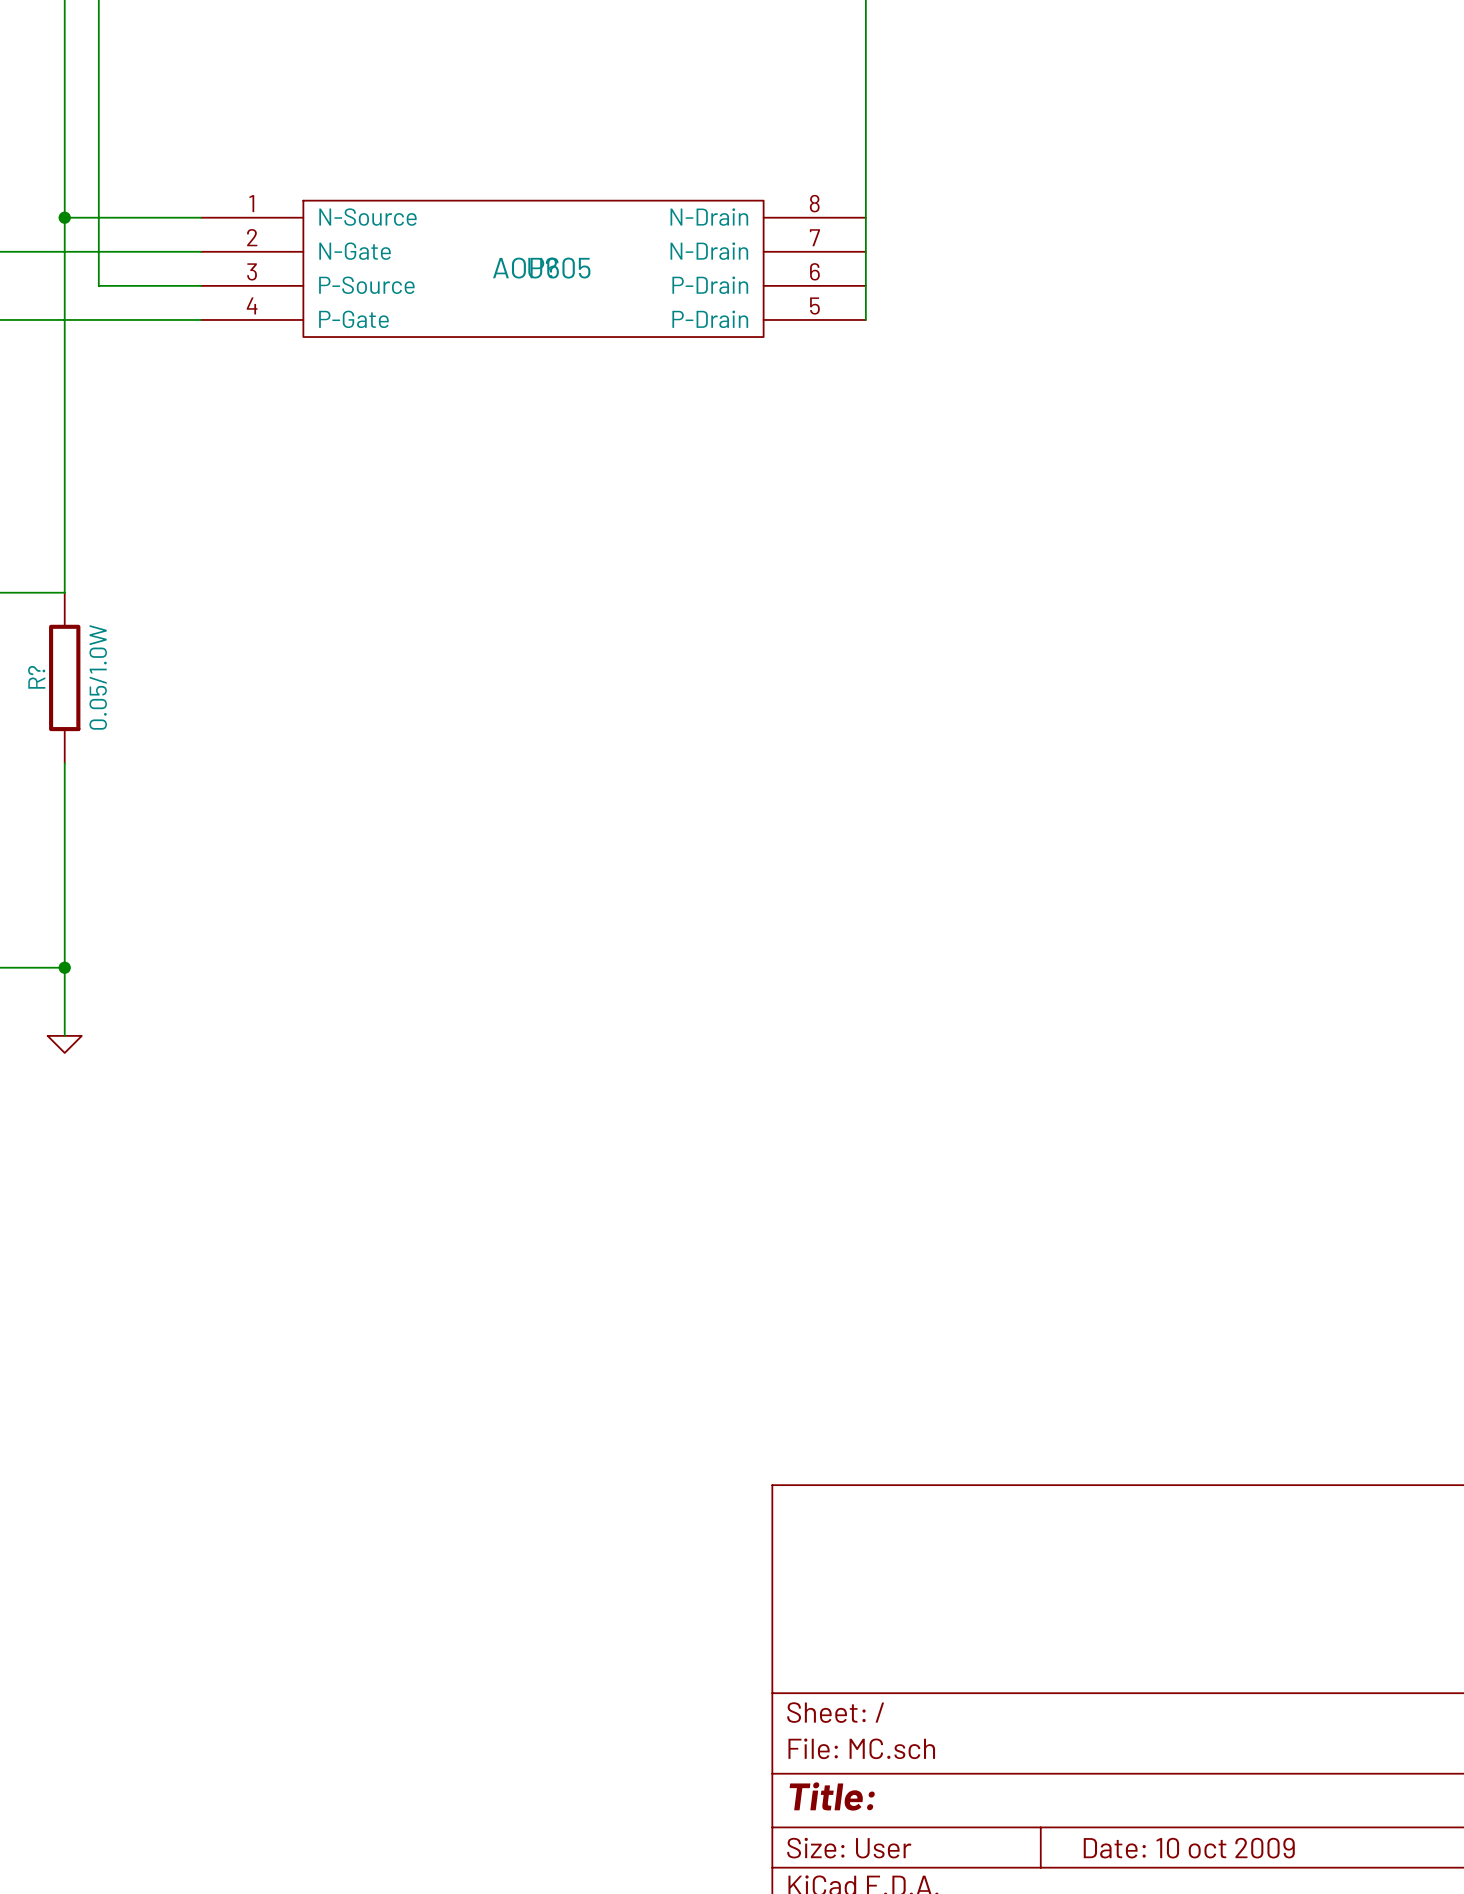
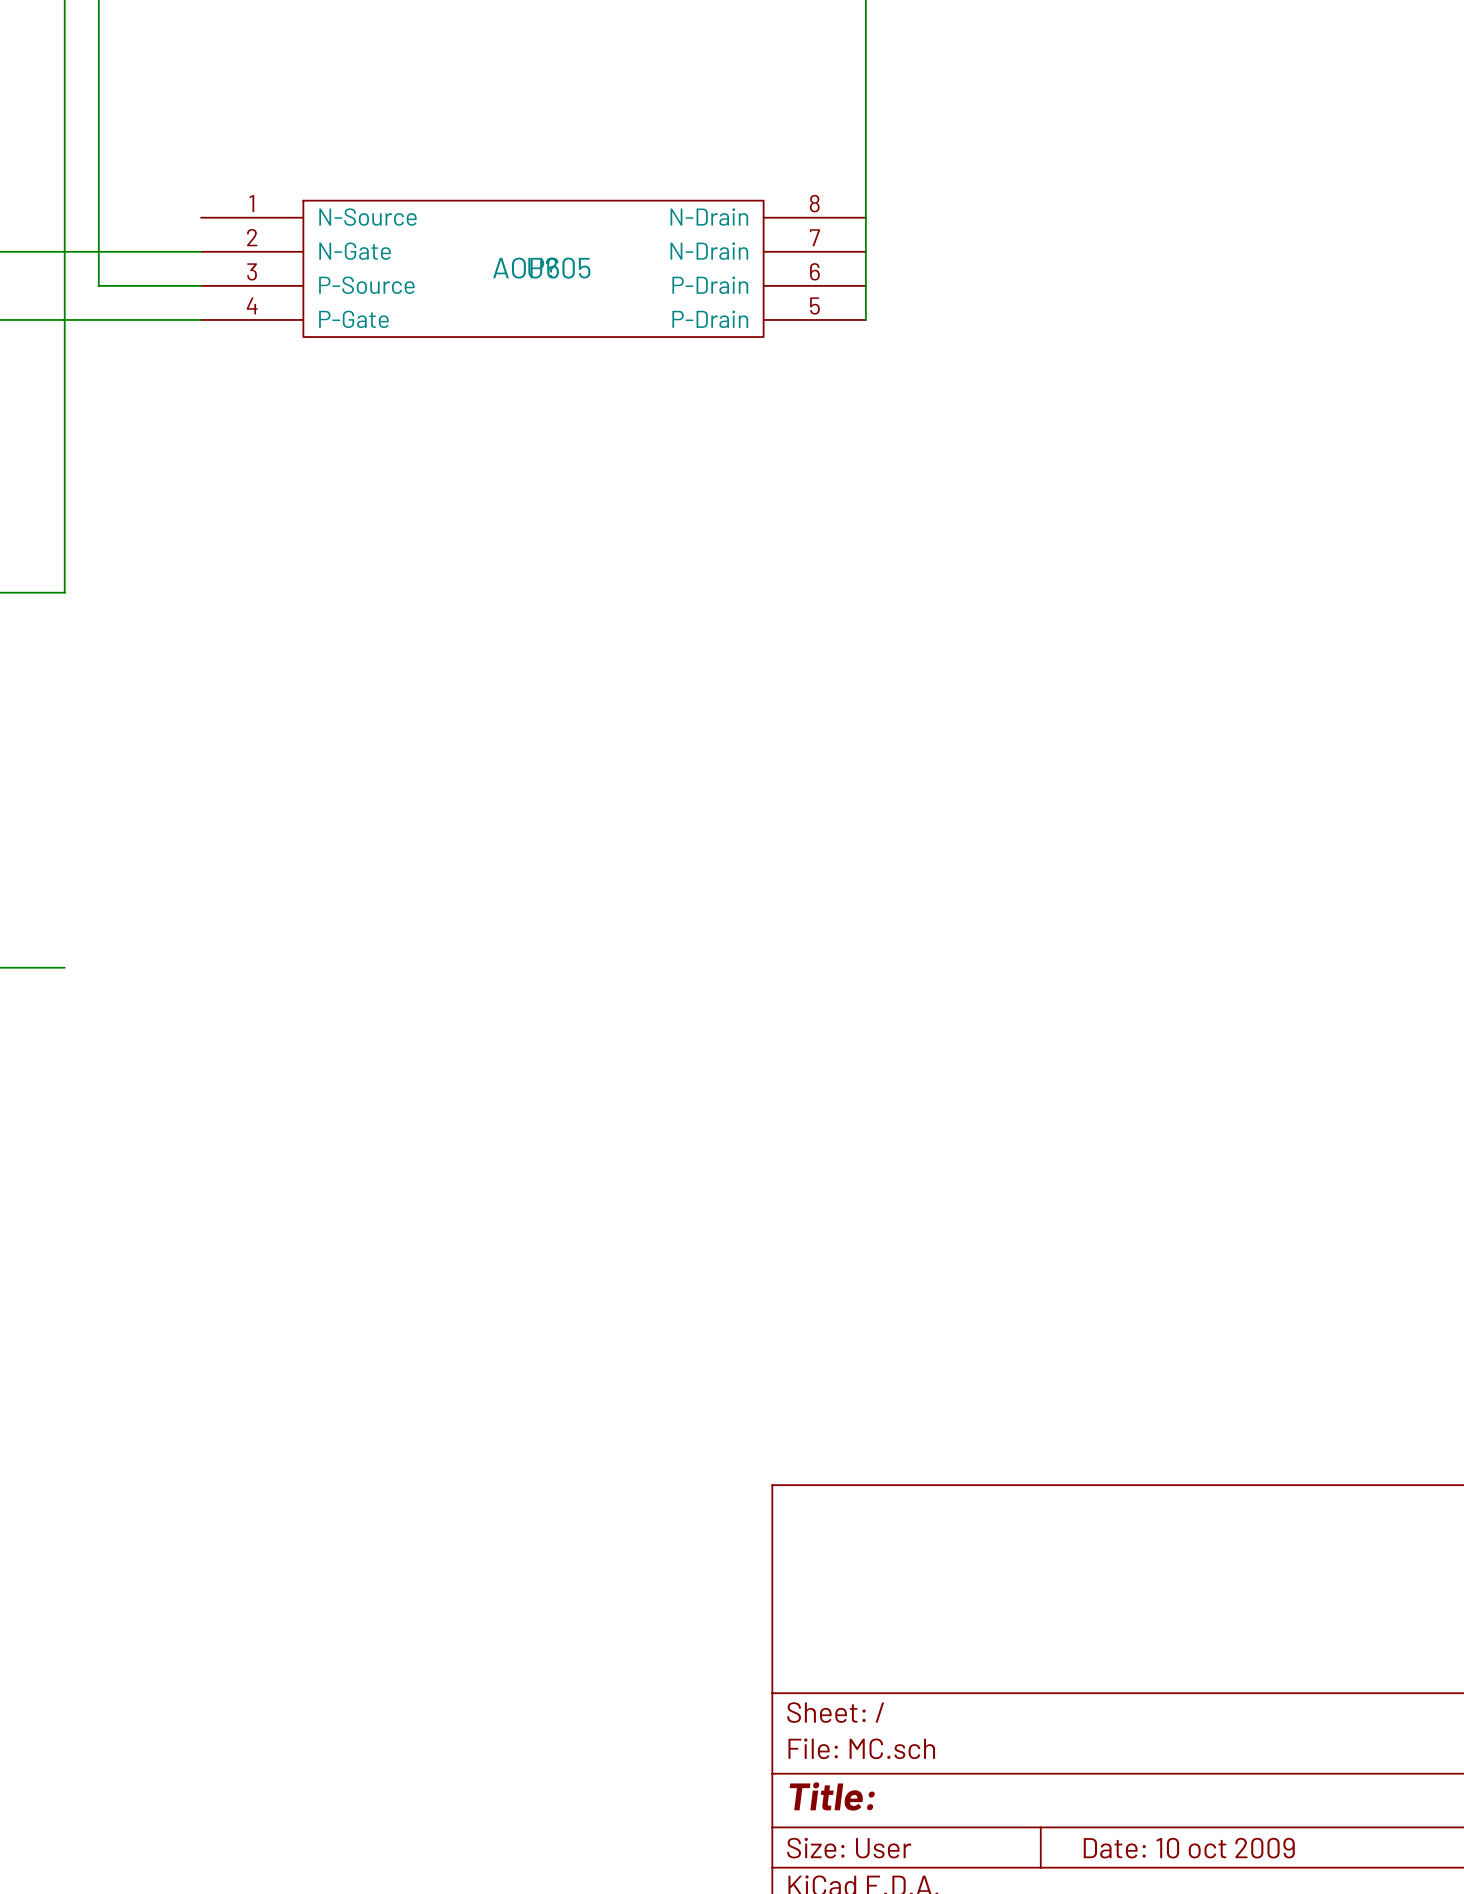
wire: (64, 217) (201, 217) -> none
junction: (64, 217) -> none
R?: 0.05/1.0W (64, 677) -> none
wire: (64, 763) (64, 1035) -> none
junction: (64, 967) -> none
power symbol: (64, 1044) -> none

